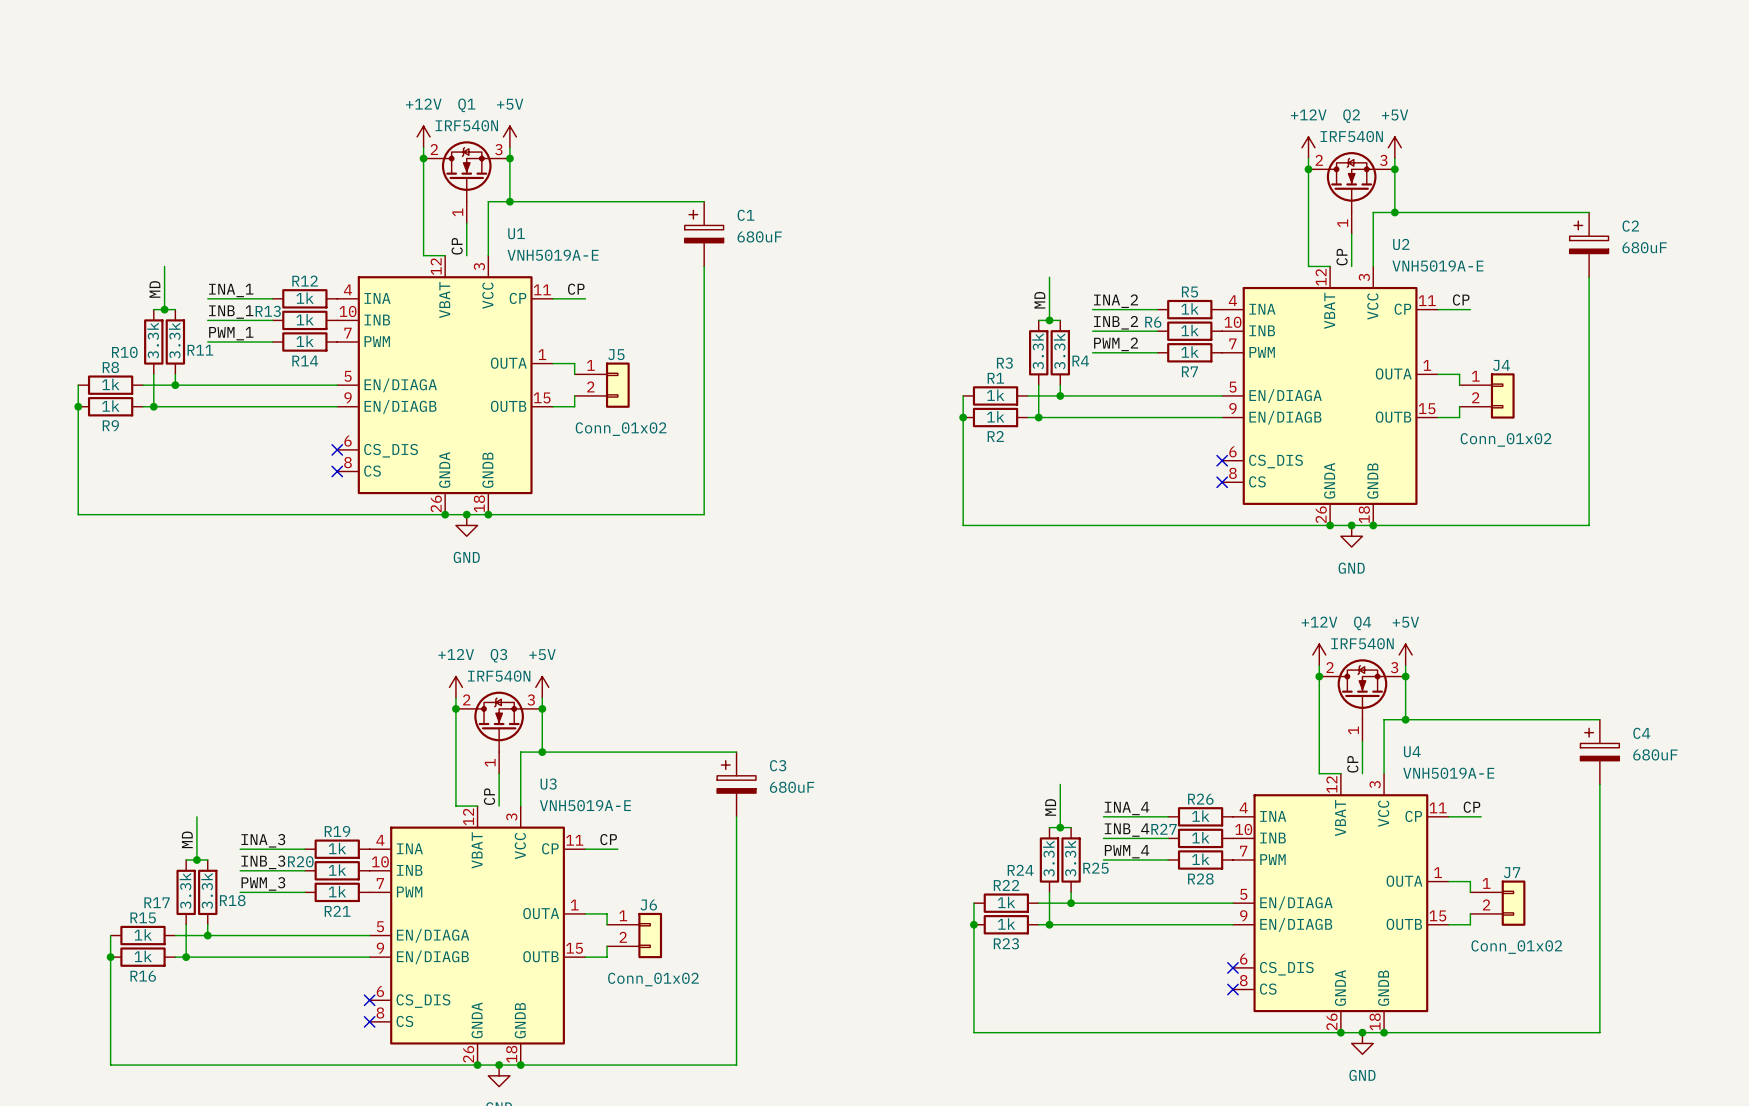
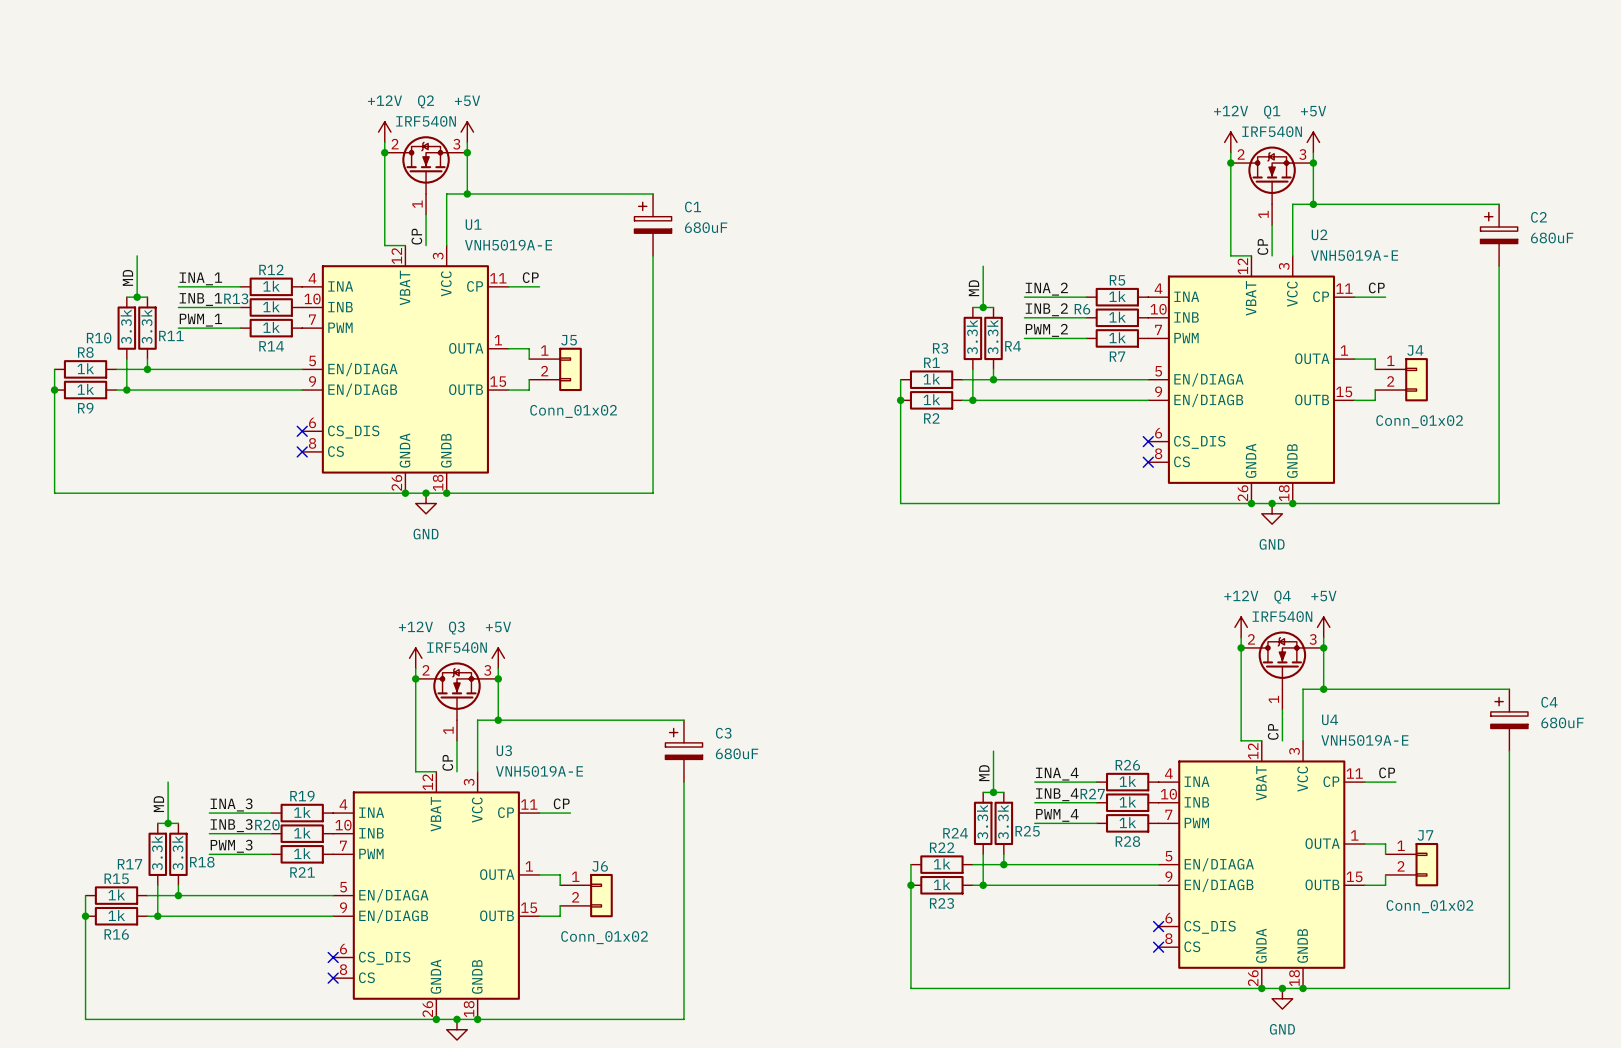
Q1 name: Q1 (466, 105) -> Q2 (425, 101)
Q2 name: Q2 (1351, 116) -> Q1 (1272, 112)

